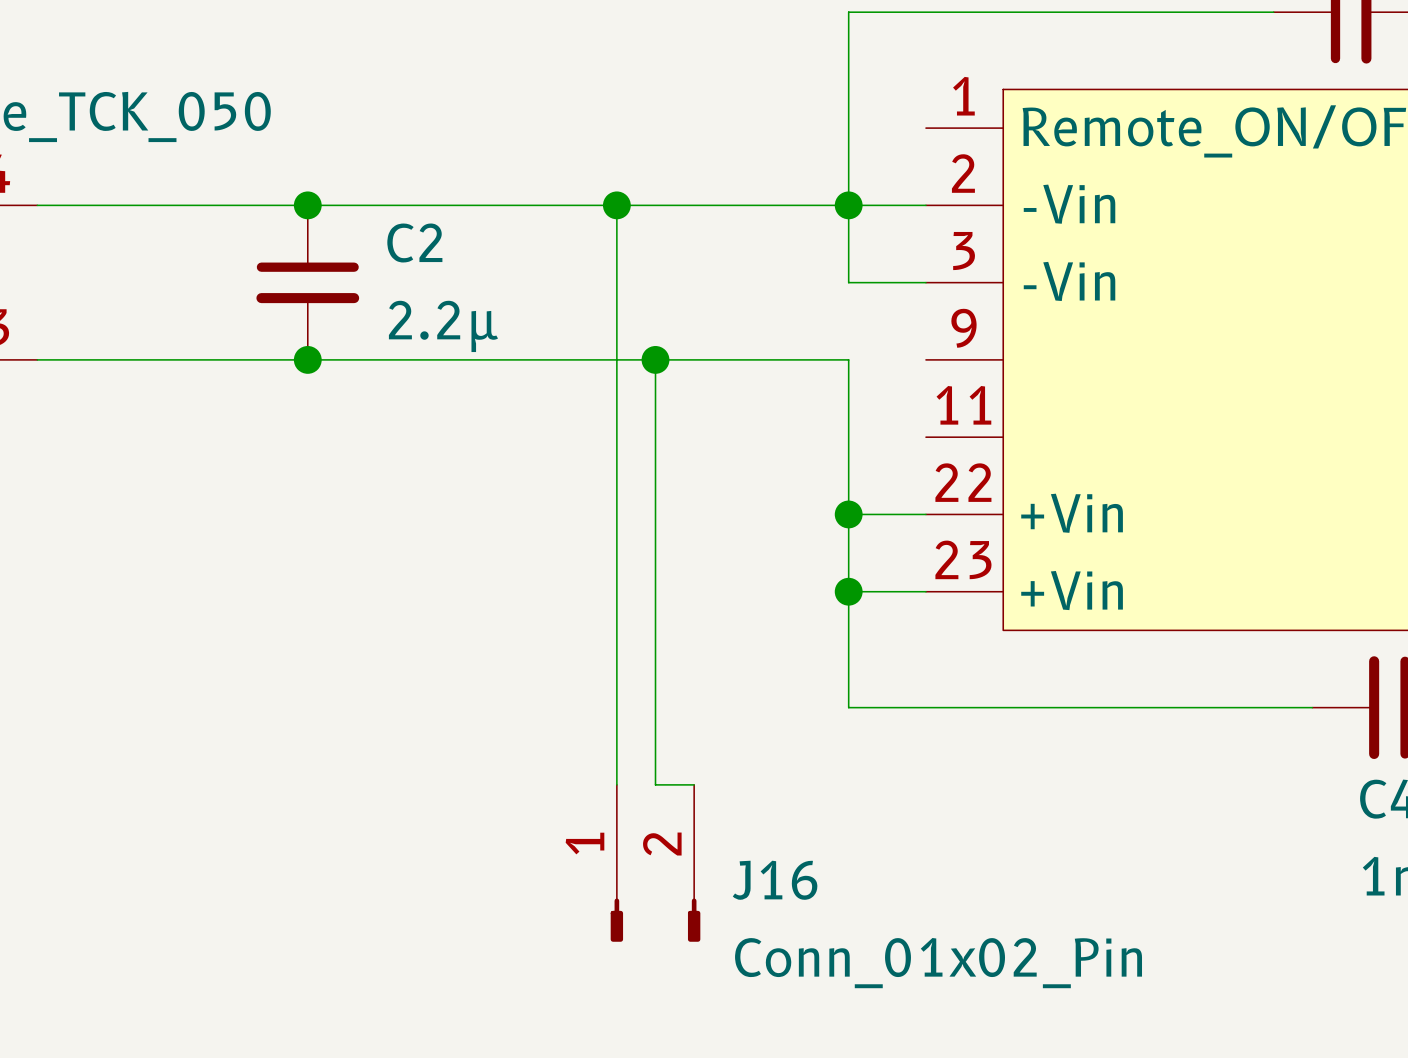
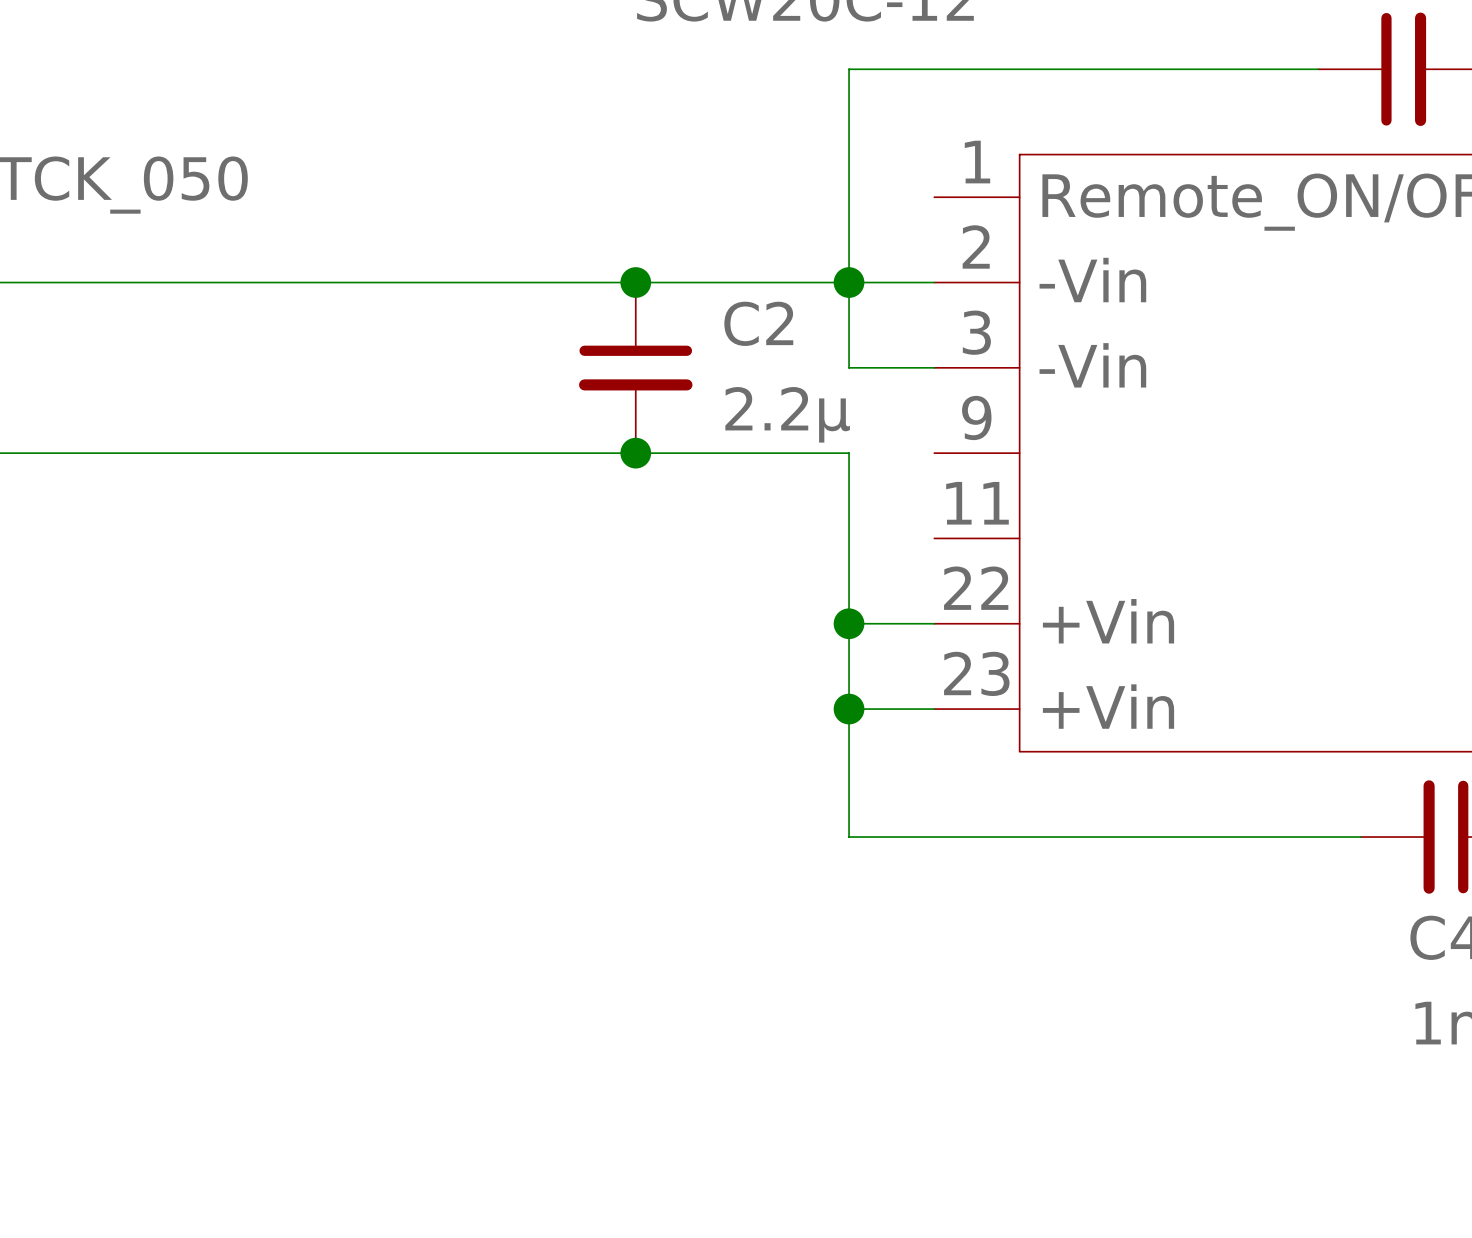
junction: (307, 205) -> none
wire: (616, 205) (616, 784) -> none
junction position: (616, 205) -> (635, 282)
C2 position: (307, 282) -> (635, 367)
junction: (307, 359) -> none
wire: (655, 359) (655, 784) (694, 784) -> none
J16: Conn_01x02_Pin (655, 863) -> none

